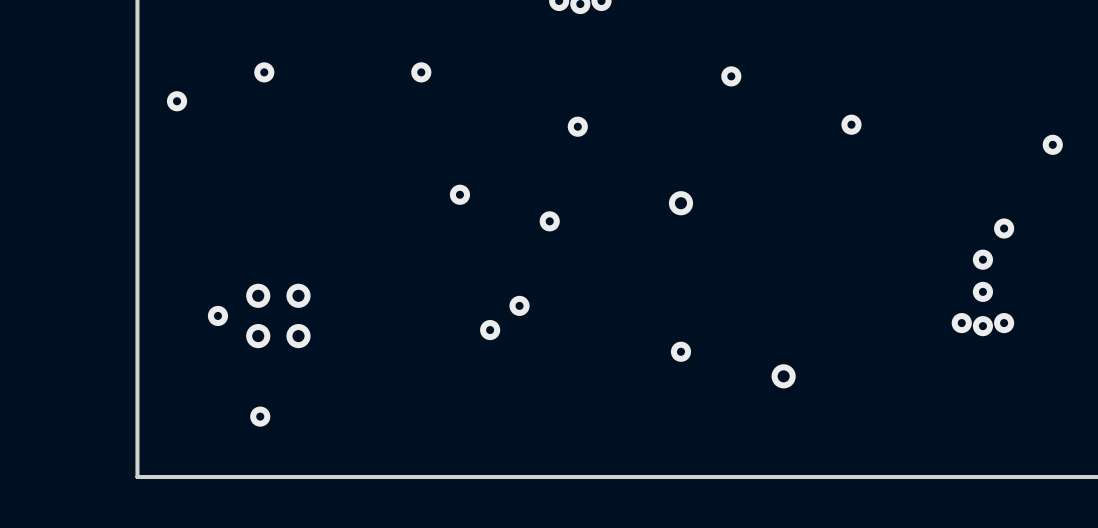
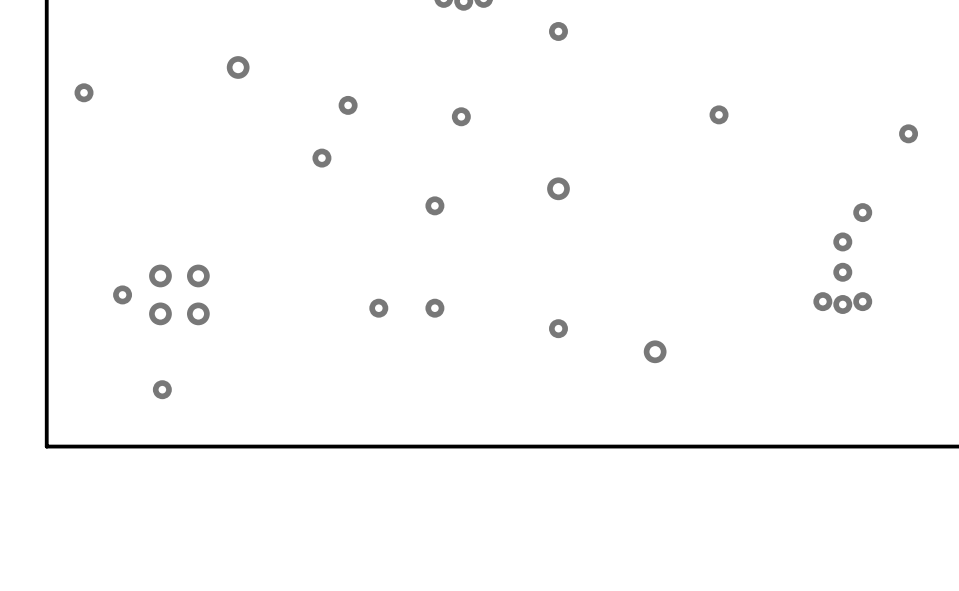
via: (264, 72) -> none
via: (421, 72) -> none
via: none -> (238, 67)
via position: (731, 76) -> (558, 31)
via: none -> (348, 105)
via position: (459, 194) -> (321, 158)
via position: (519, 305) -> (434, 308)

